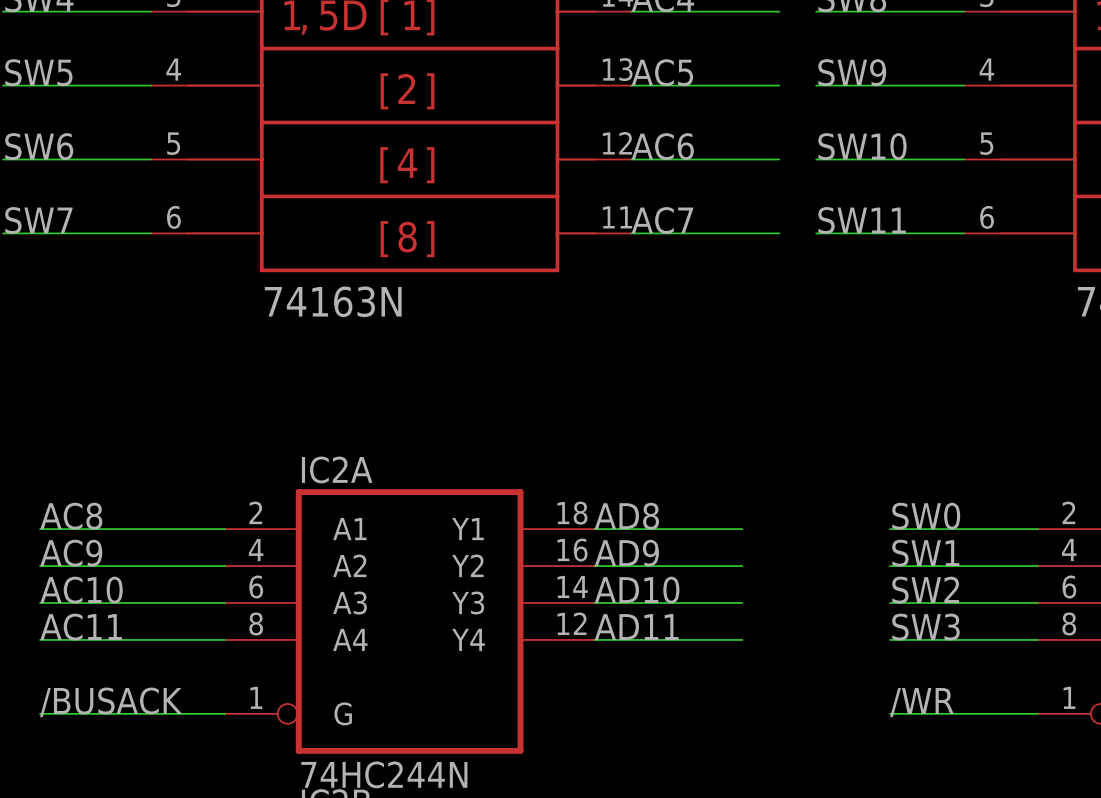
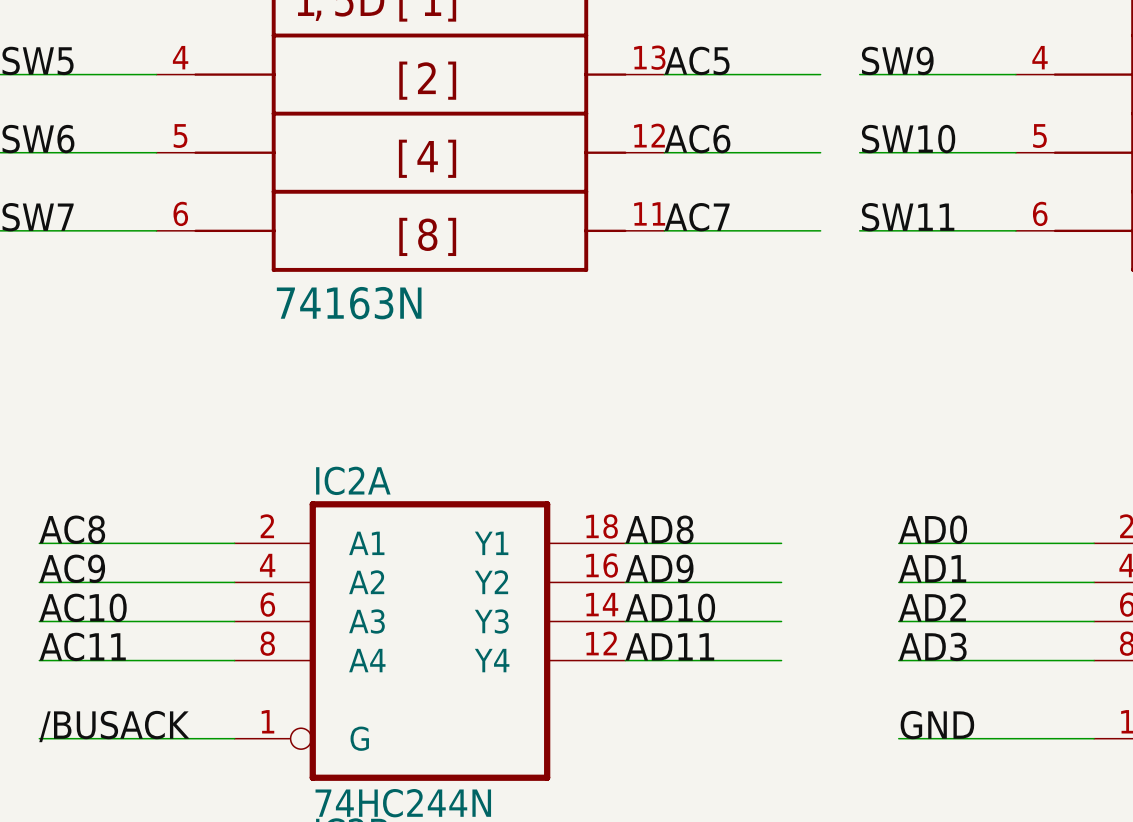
label: none -> AD0 (933, 529)
label: SW0 (926, 516) -> none
wire: none -> (898, 543) (937, 543)
label: none -> AD1 (932, 568)
label: SW1 (925, 553) -> none
wire: none -> (898, 582) (937, 582)
label: none -> AD2 (932, 607)
label: SW2 (925, 590) -> none
wire: none -> (898, 621) (937, 621)
label: none -> AD3 (932, 646)
label: SW3 (925, 627) -> none
wire: none -> (898, 660) (937, 660)
label: none -> GND (937, 725)
label: /WR (921, 702) -> none
wire: none -> (898, 738) (937, 738)

